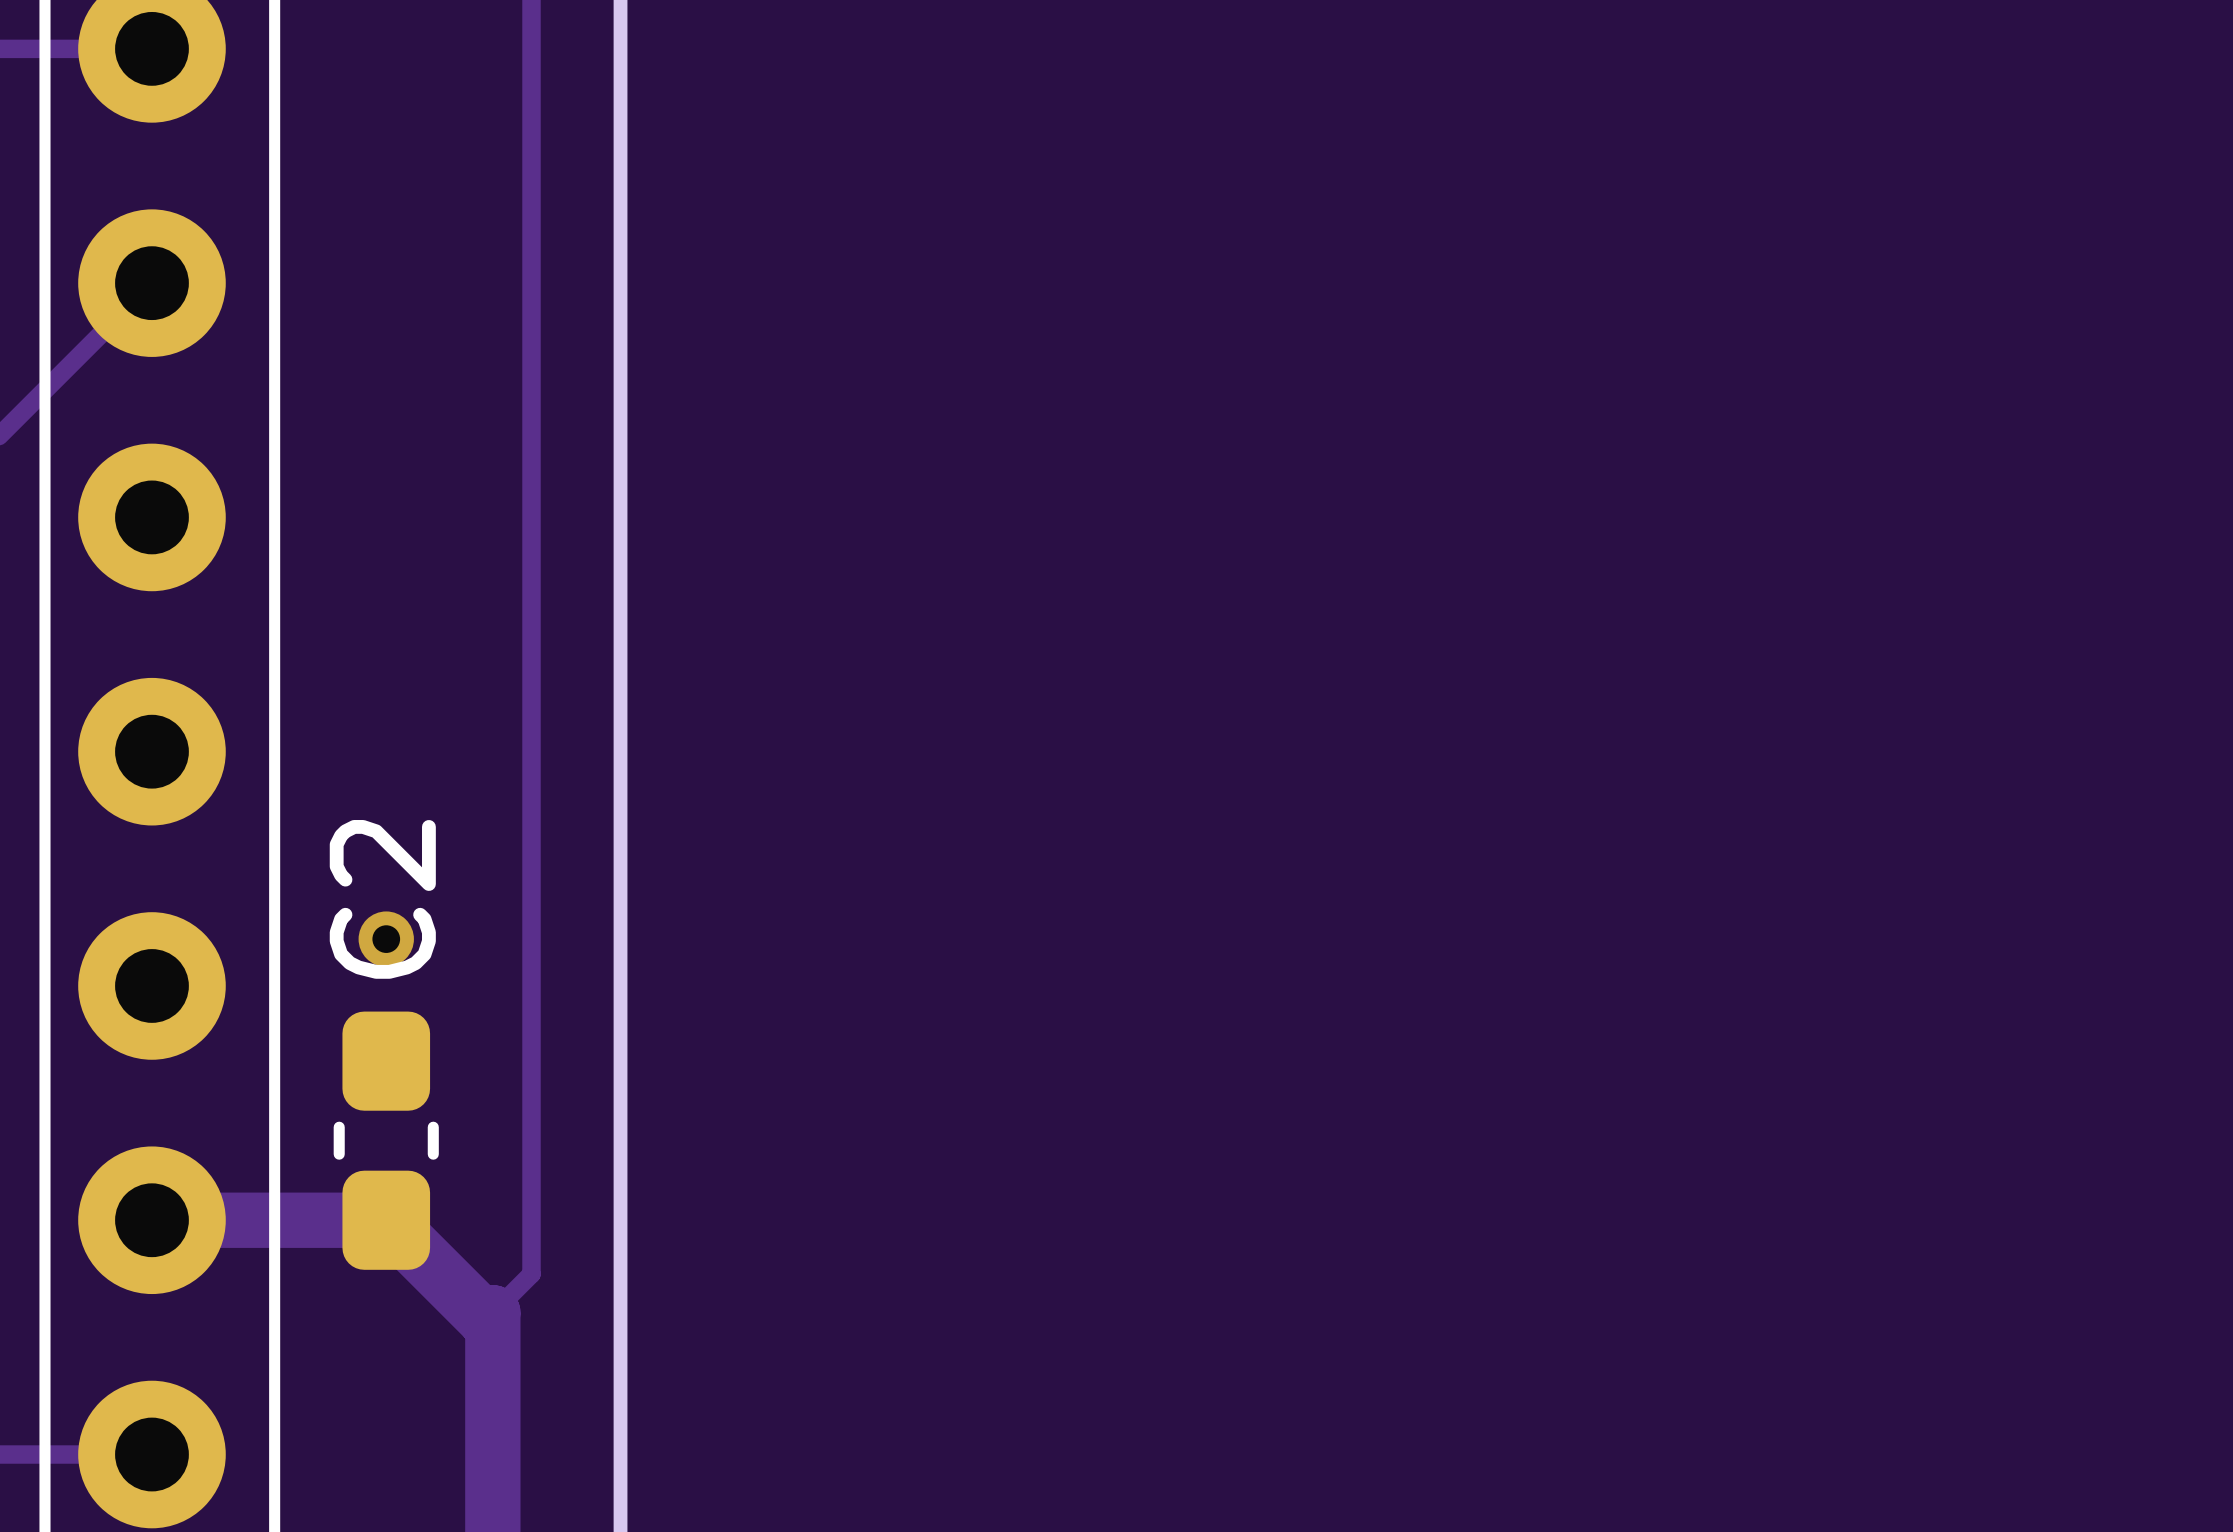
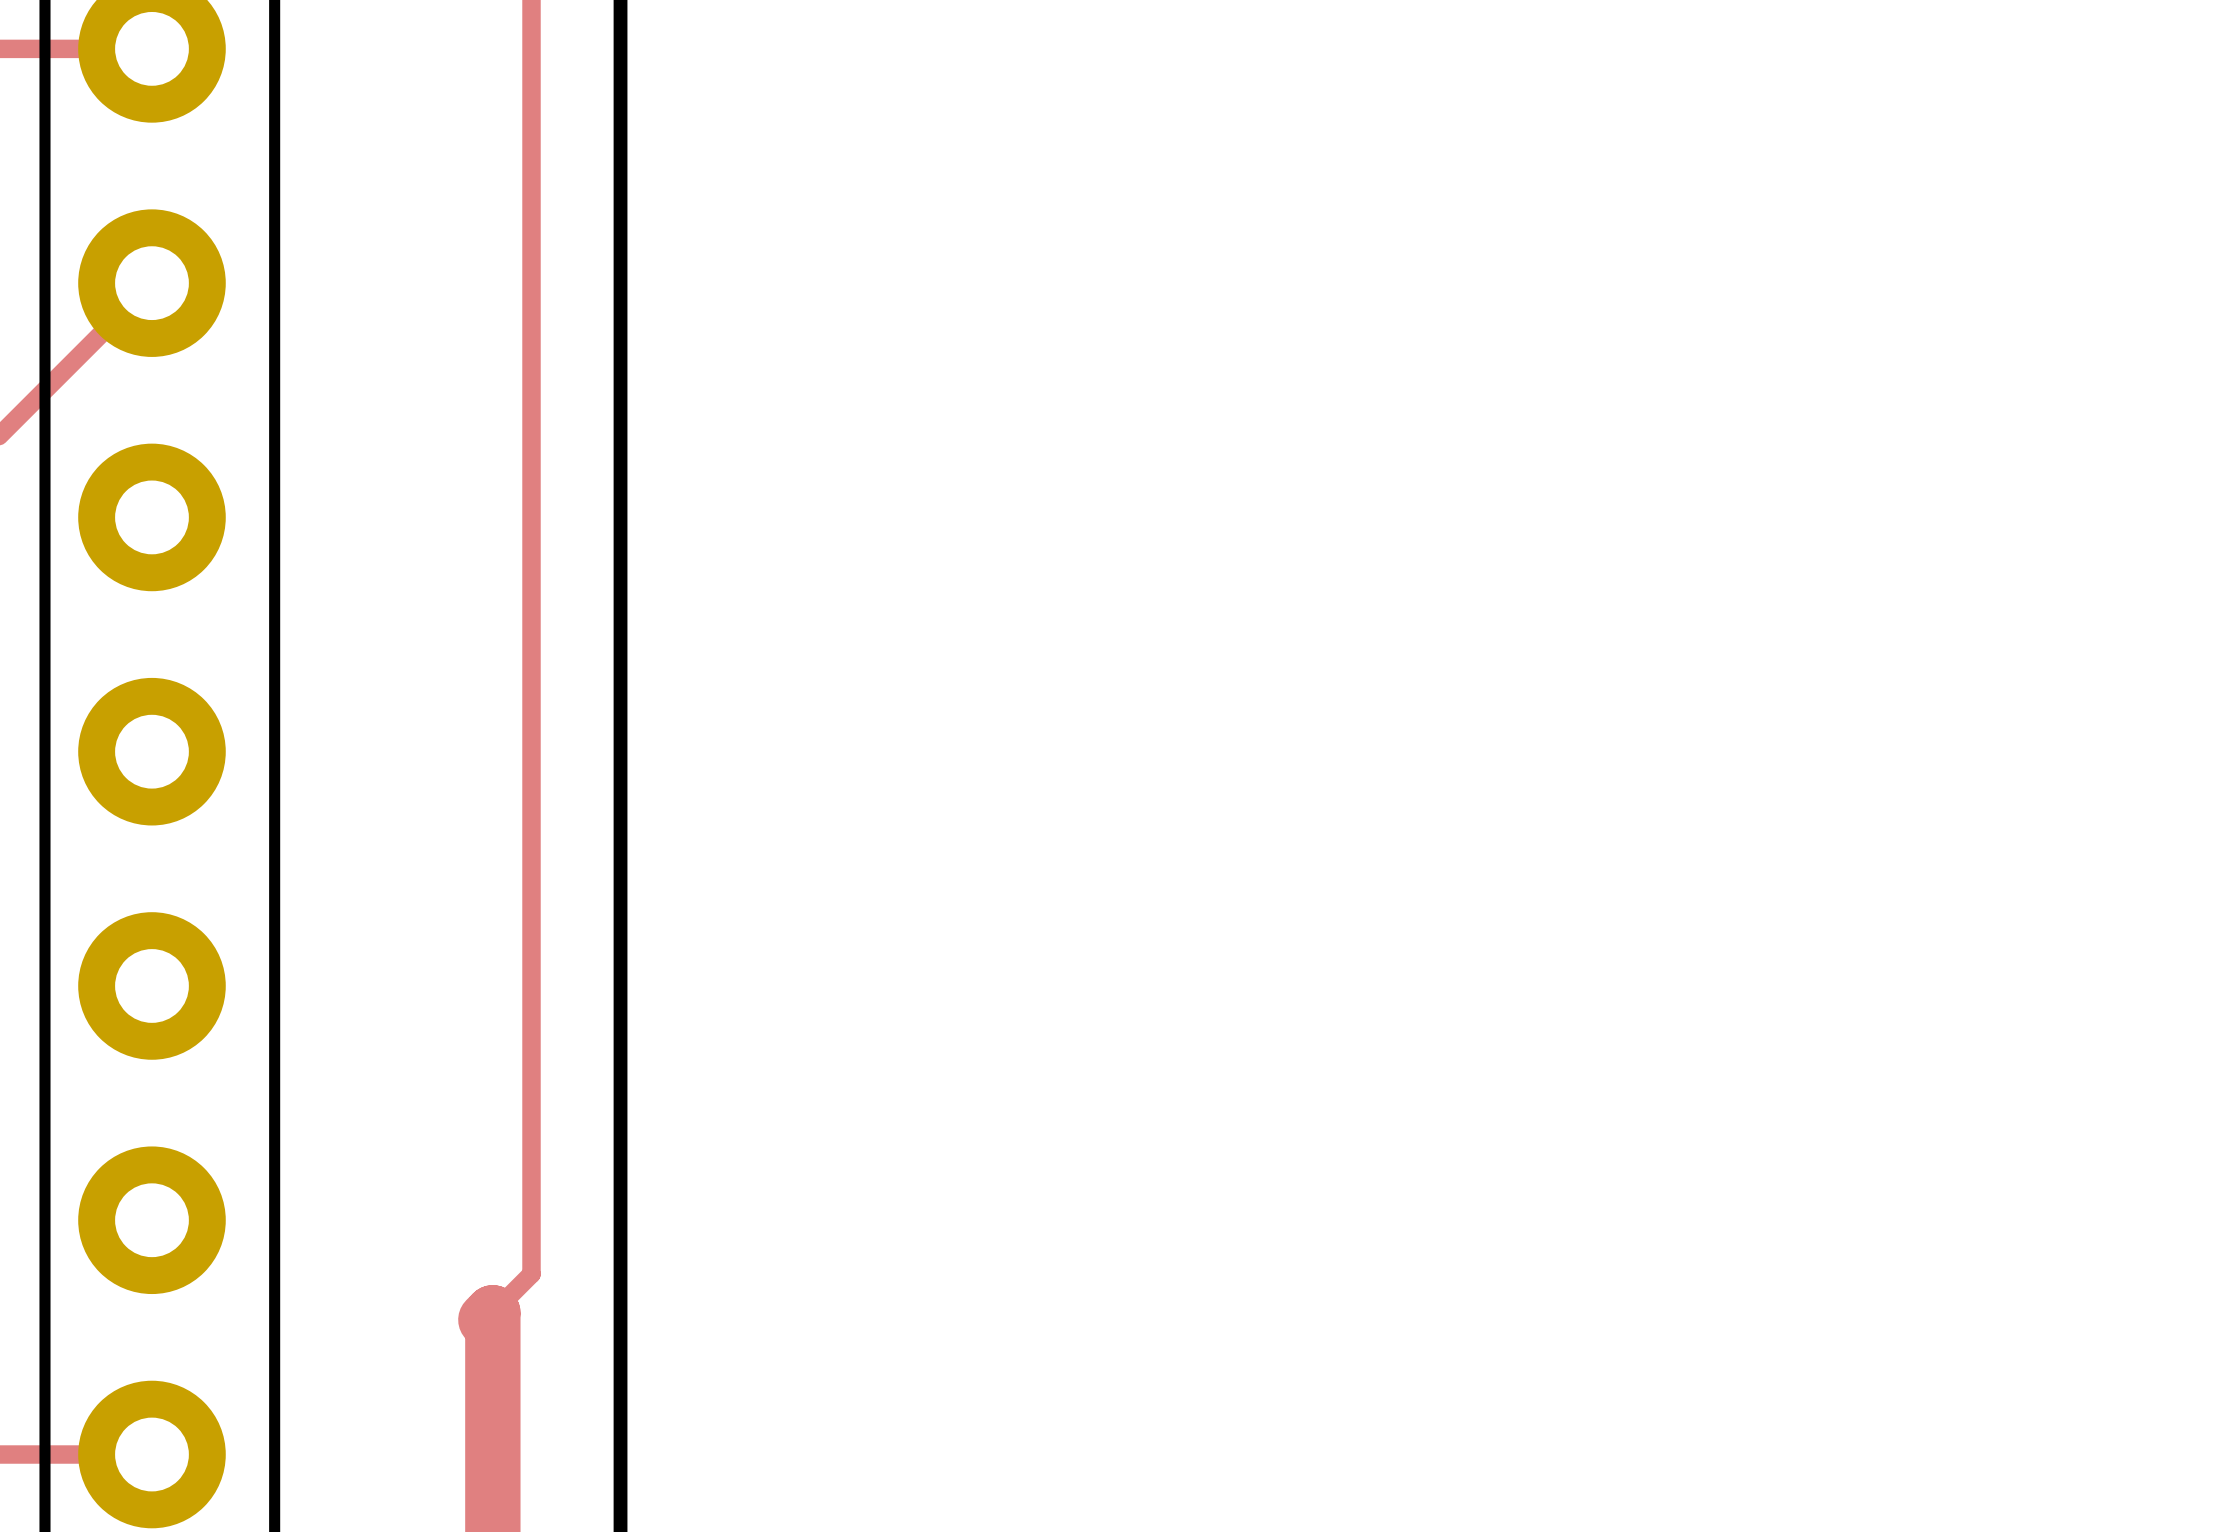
via: (386, 939) -> none
C2: (386, 1140) -> none
track: (151, 1220) (386, 1220) (485, 1319) -> none

